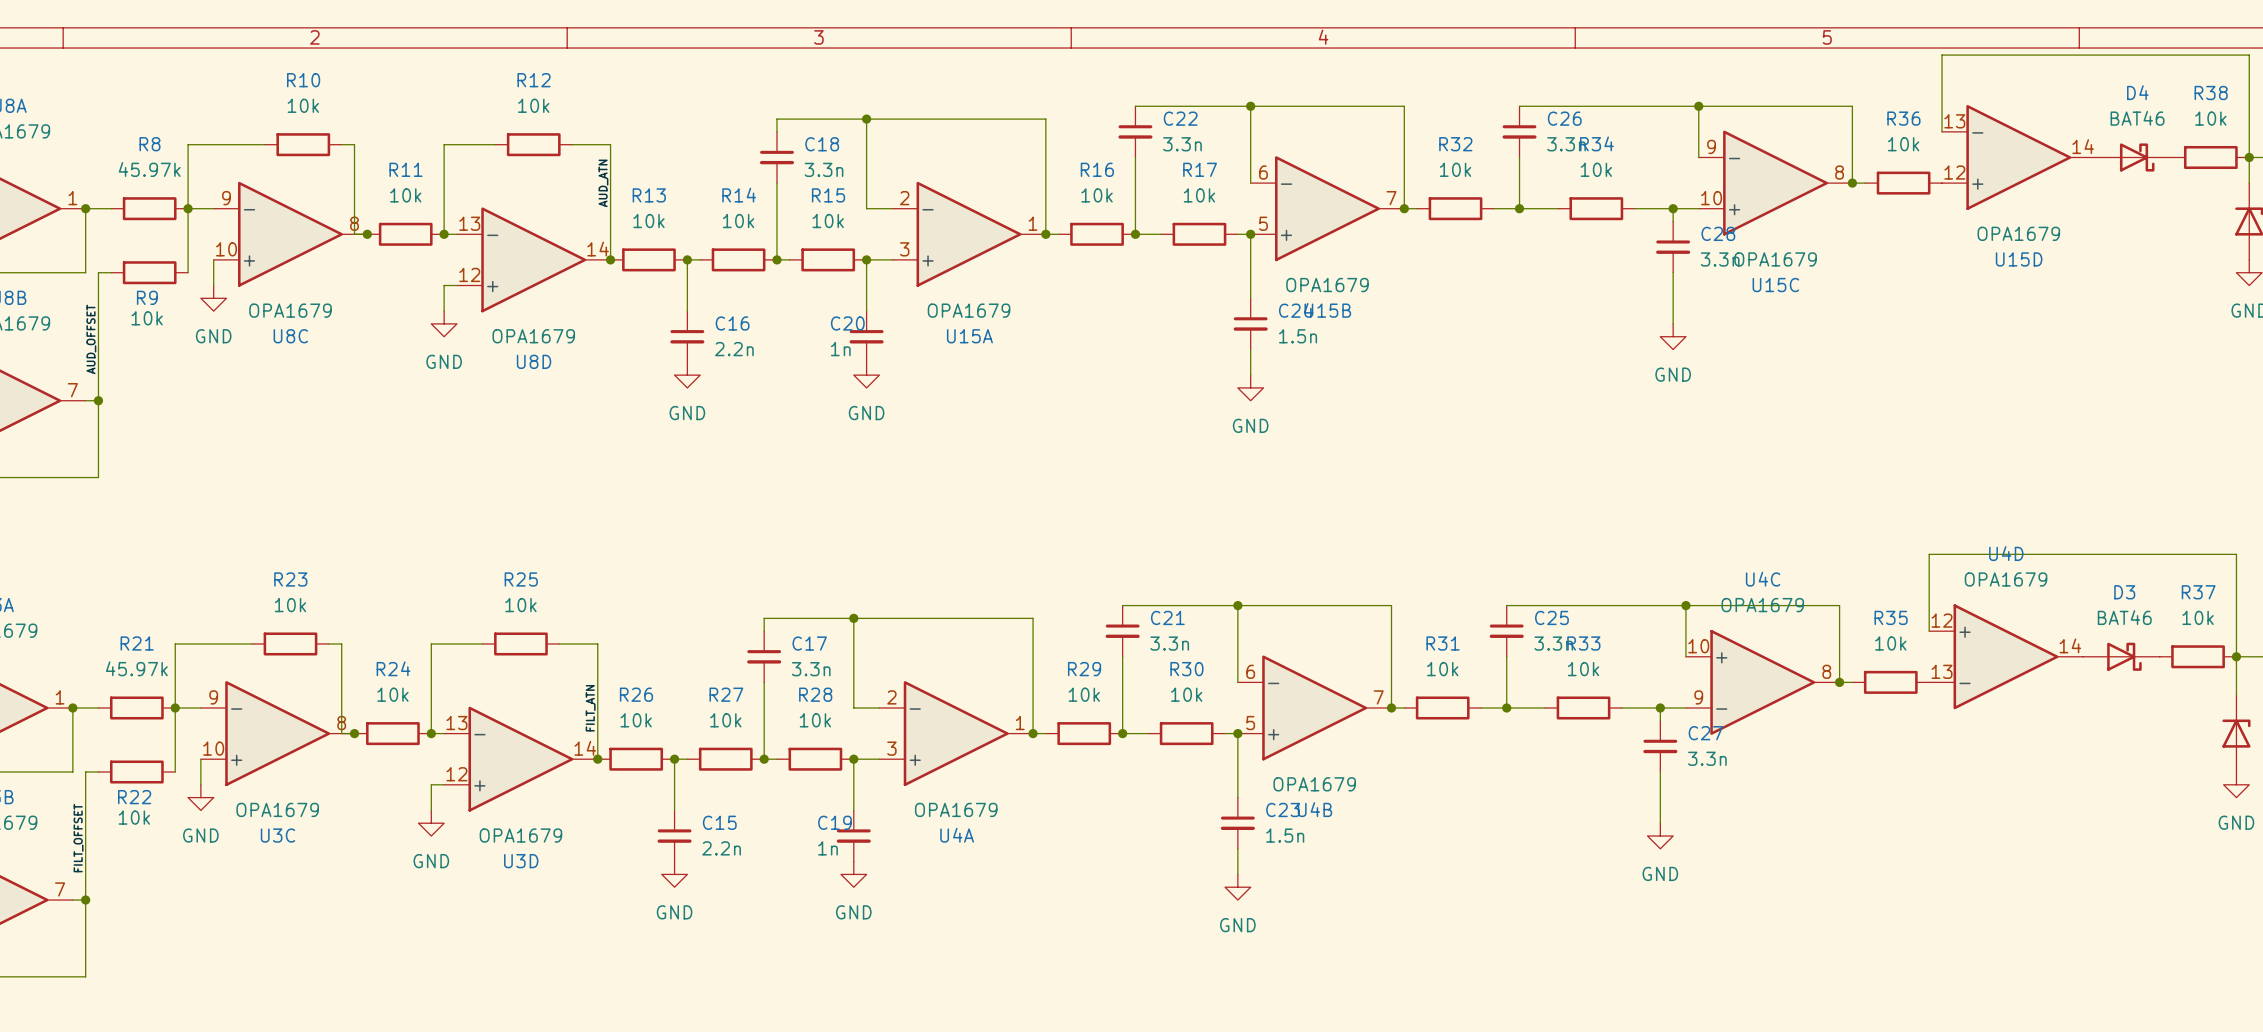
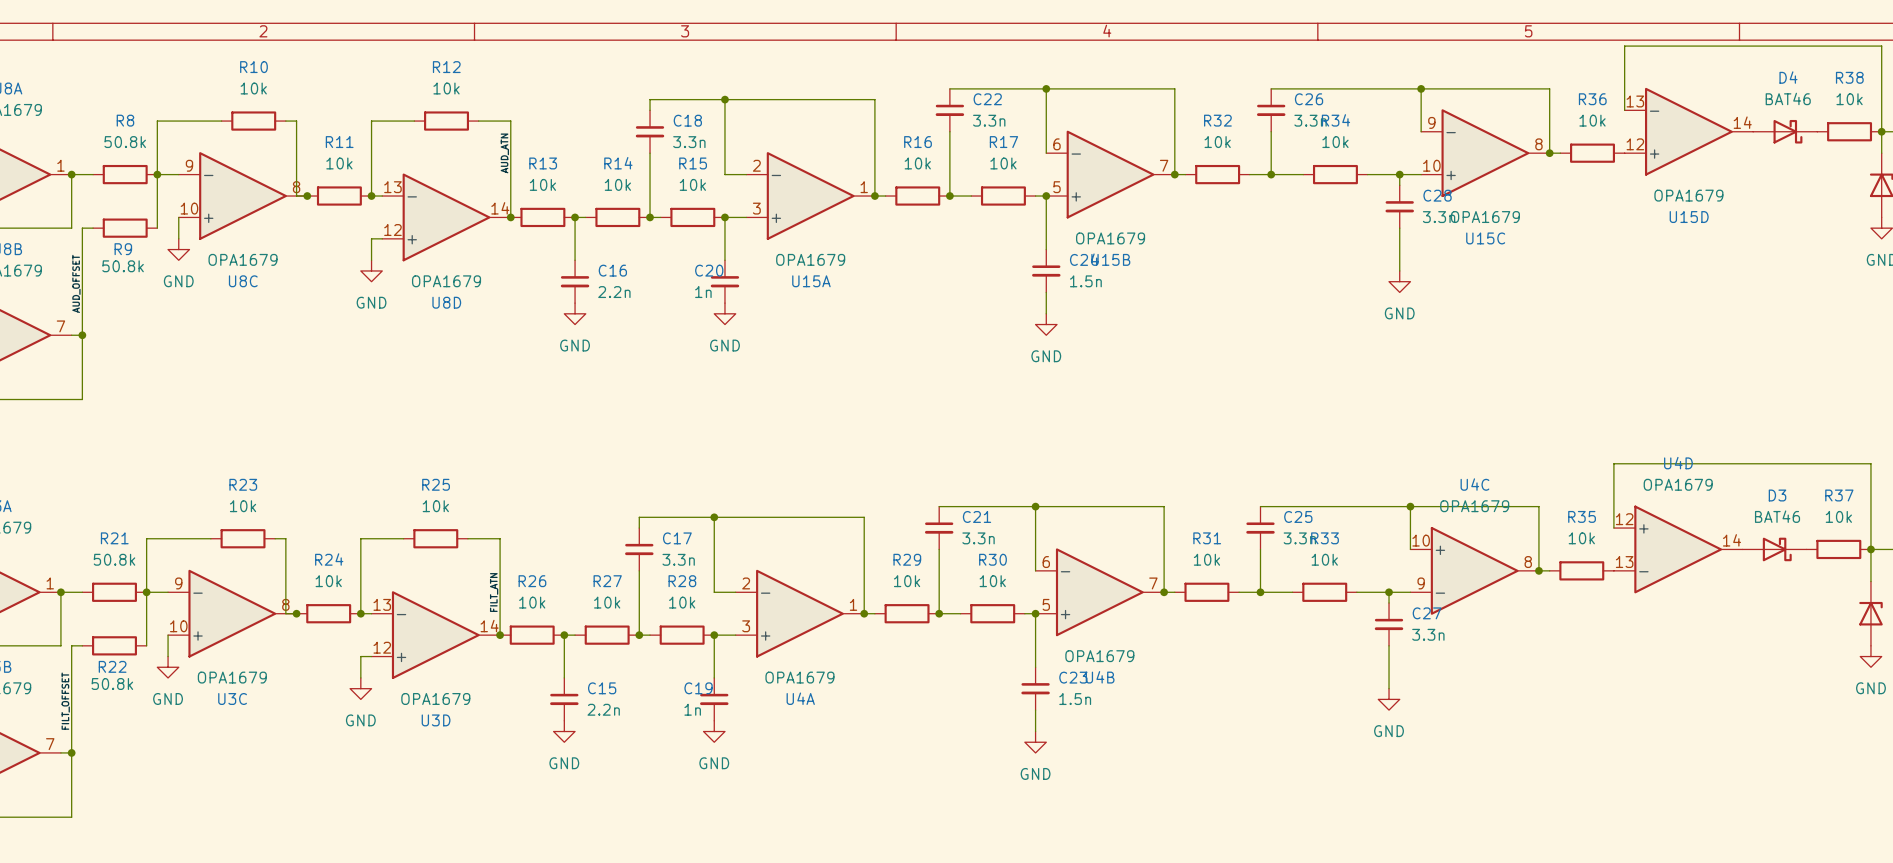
R8 value: 45.97k (149, 169) -> 50.8k (125, 142)
R9 value: 10k (147, 318) -> 50.8k (123, 266)
R21 value: 45.97k (136, 668) -> 50.8k (114, 559)
R22 value: 10k (134, 817) -> 50.8k (112, 684)

